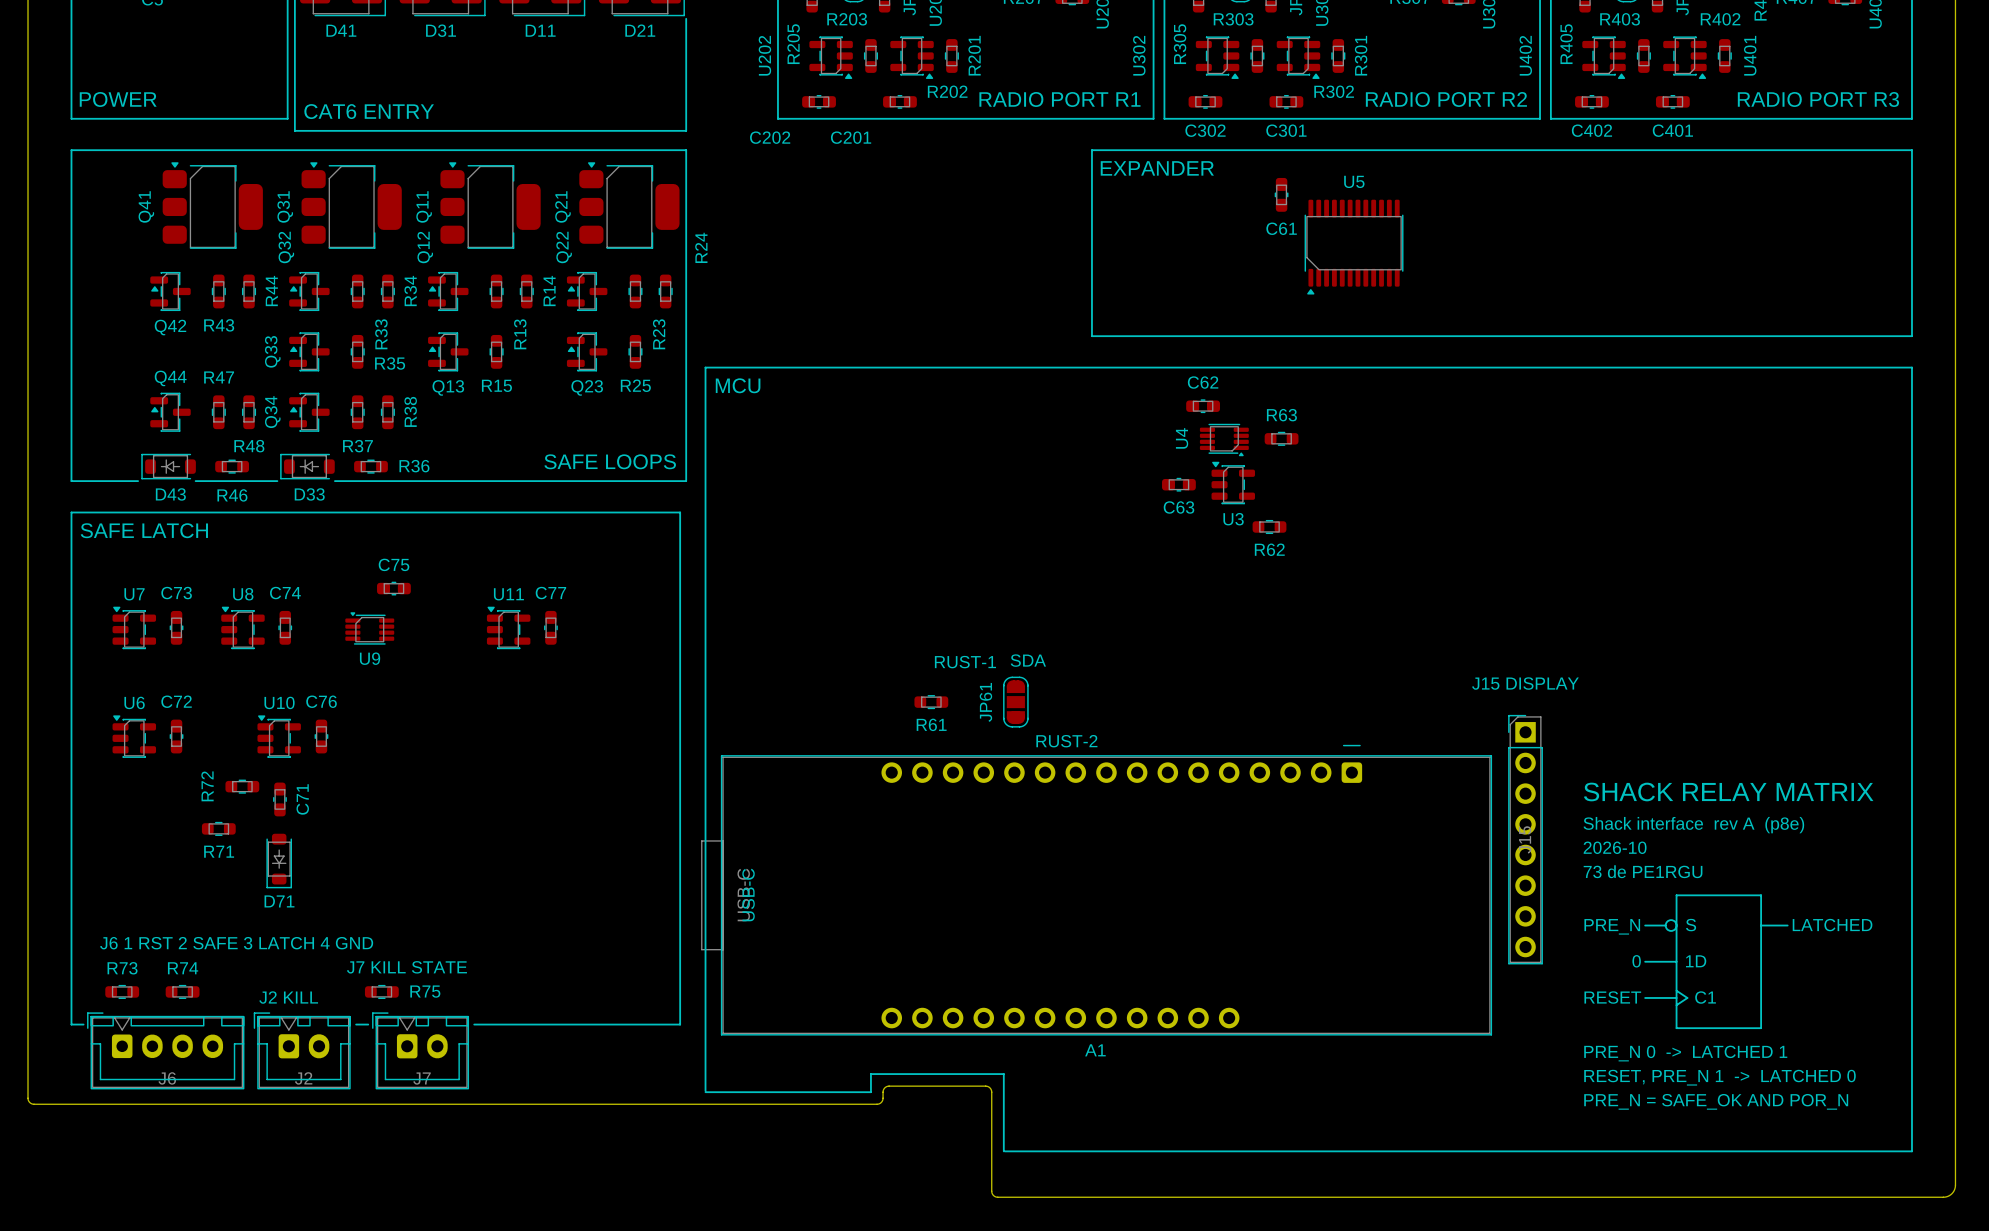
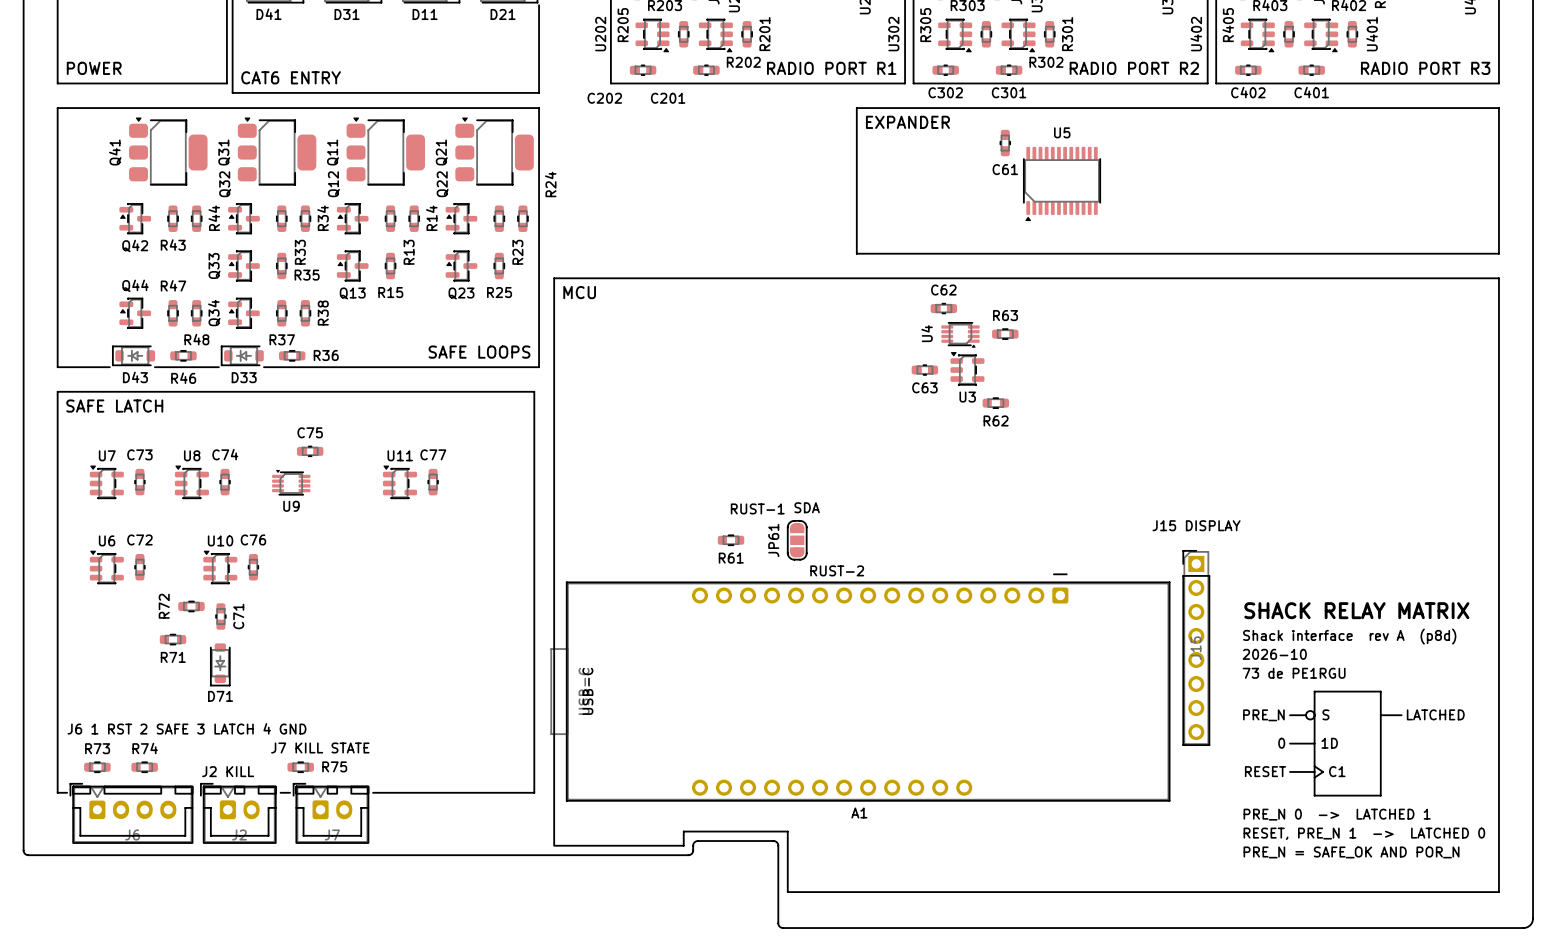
text: Shack interface rev A (p8e) (1693, 825) -> Shack interface rev A (p8d) (1349, 636)

